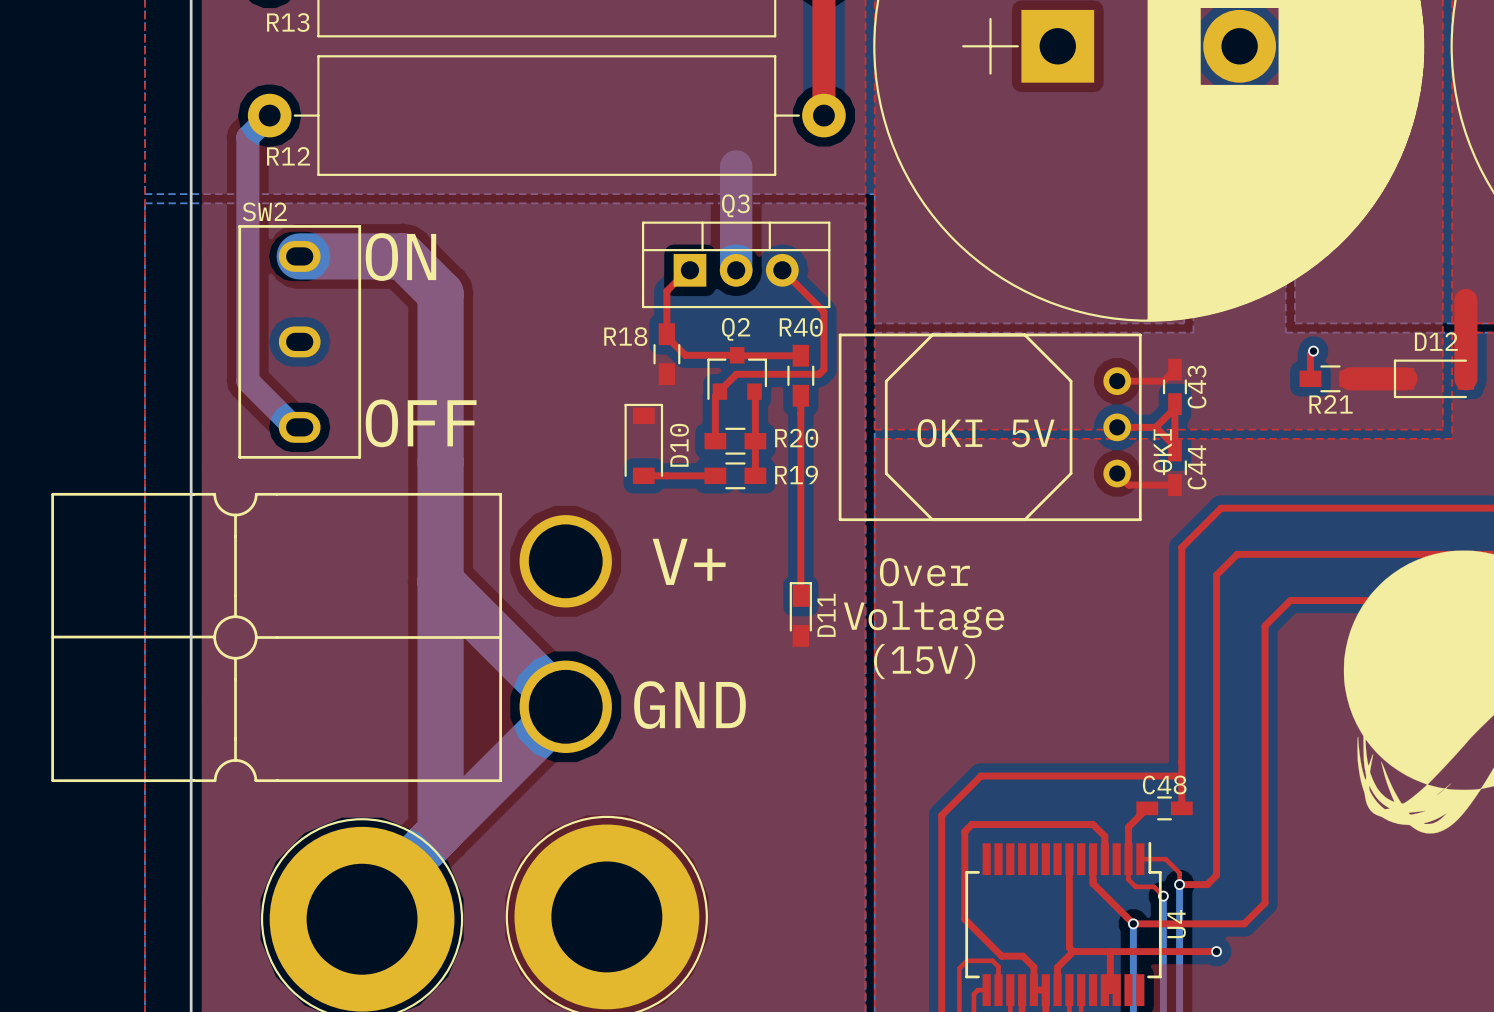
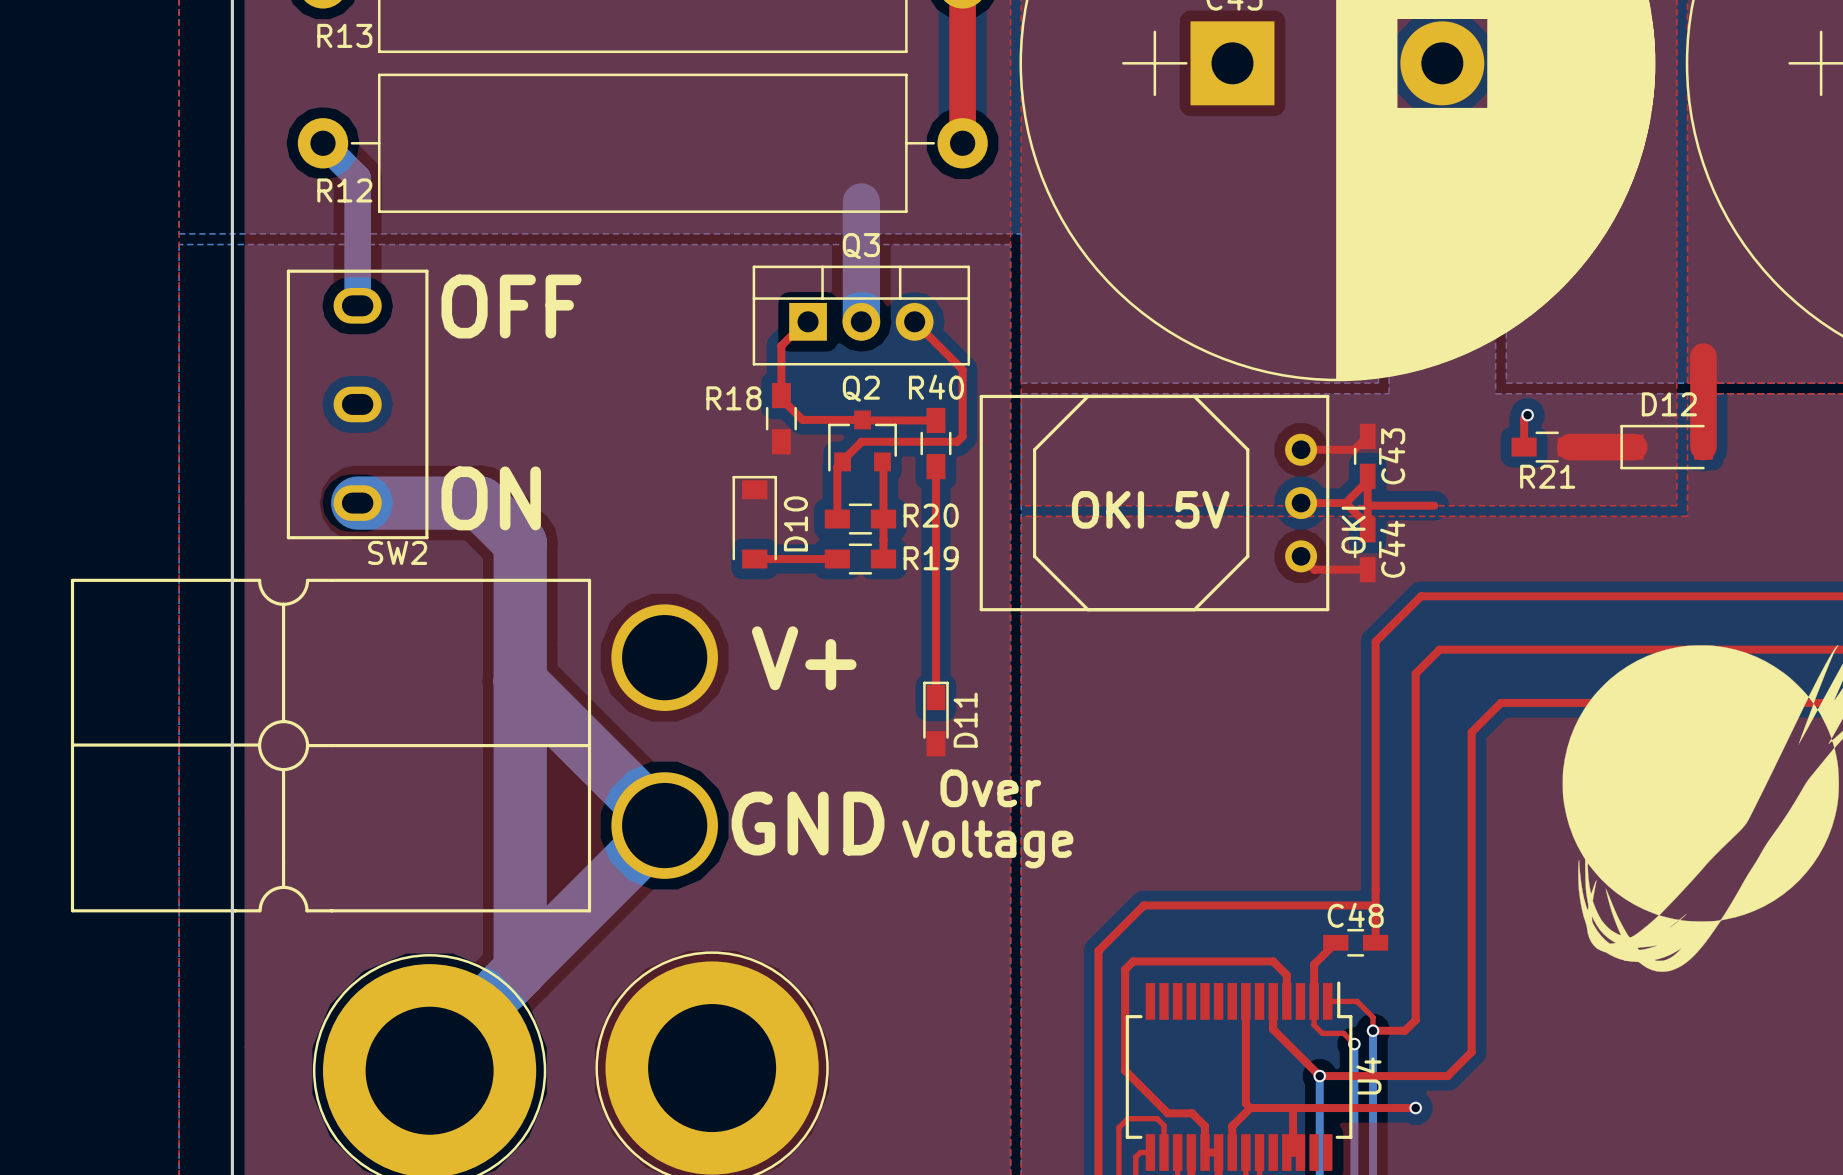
bottom track: (269, 115) (247, 137) (247, 380) (294, 427) (299, 427) -> (323, 143) (357, 177) (357, 305)
SW2 name position: SW2 (264, 211) -> SW2 (397, 552)
bottom track: (299, 256) (403, 256) (440, 293) (440, 461) -> (357, 503) (480, 503) (520, 543)
text: ON (400, 257) -> OFF (511, 306)
text: OFF (421, 423) -> ON (491, 498)
top track: none -> (1367, 505) (1434, 505)
text position: Over (924, 572) -> Over (990, 788)
text position: Voltage (924, 619) -> Voltage (987, 844)
text: (15V) (924, 661) -> none

